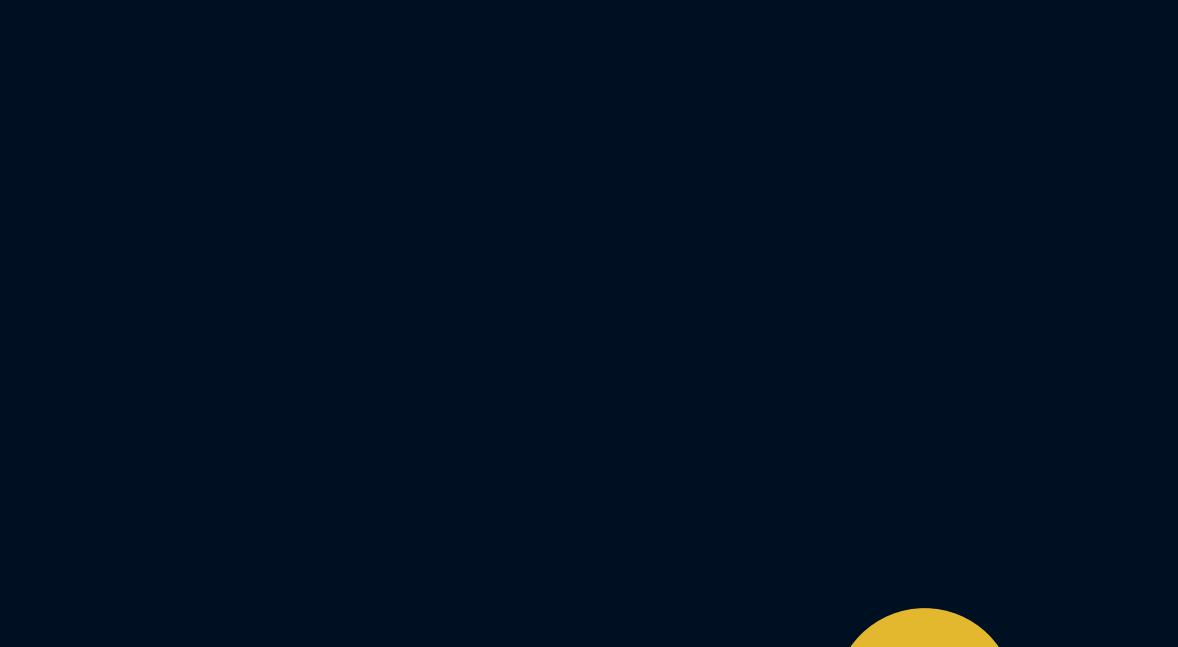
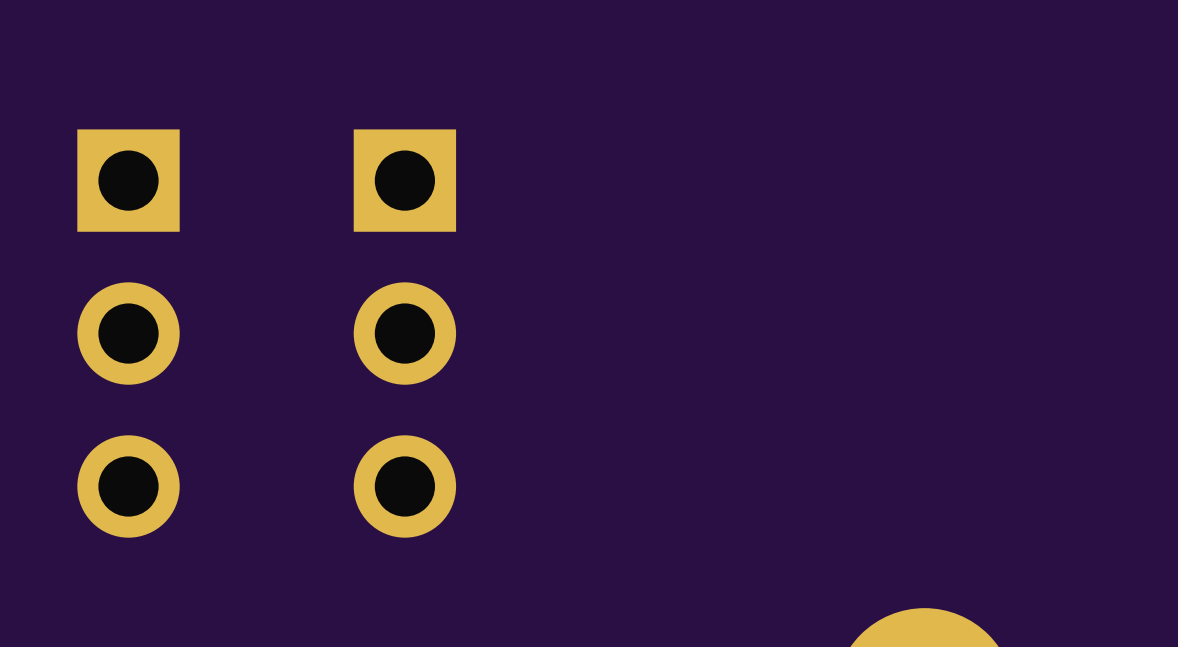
part: none -> (128, 333)
part: none -> (404, 333)

